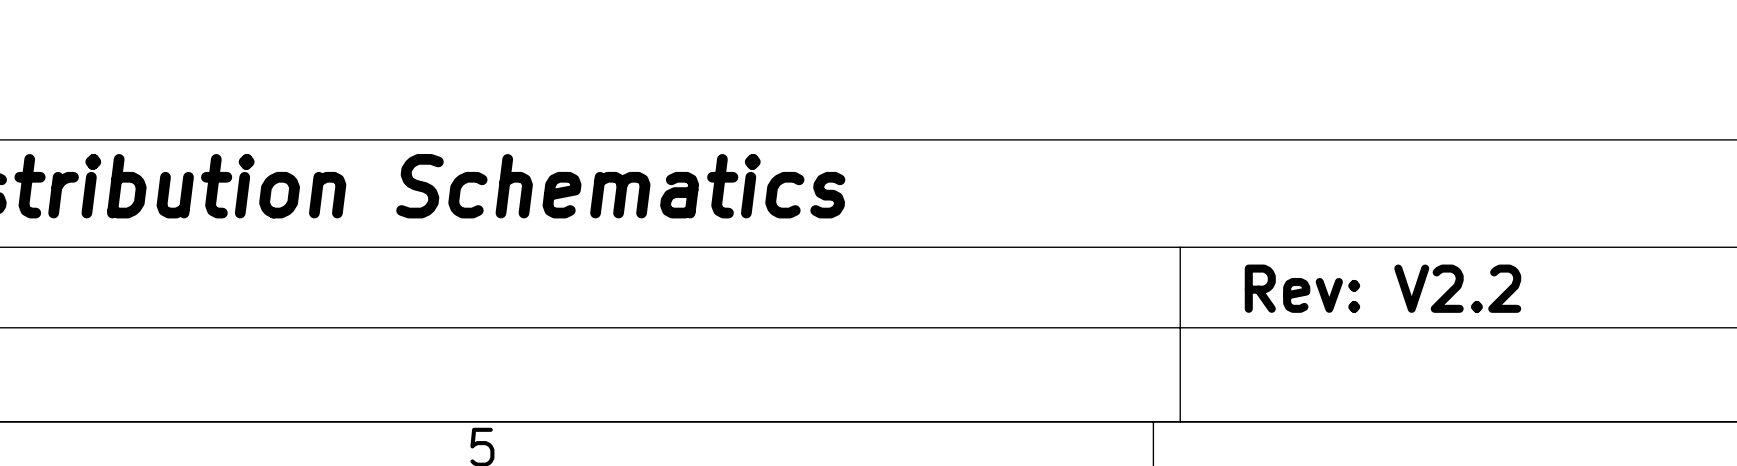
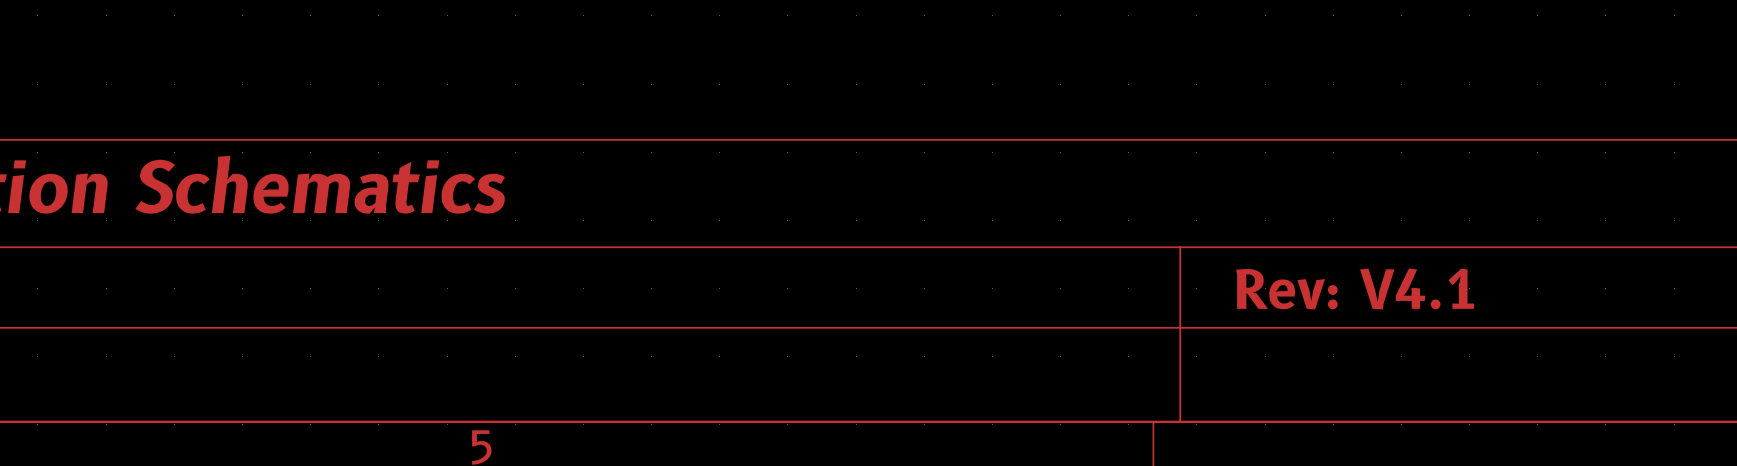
title block: Rev: V2.2 (1382, 288) -> Rev: V4.1 (1355, 289)

